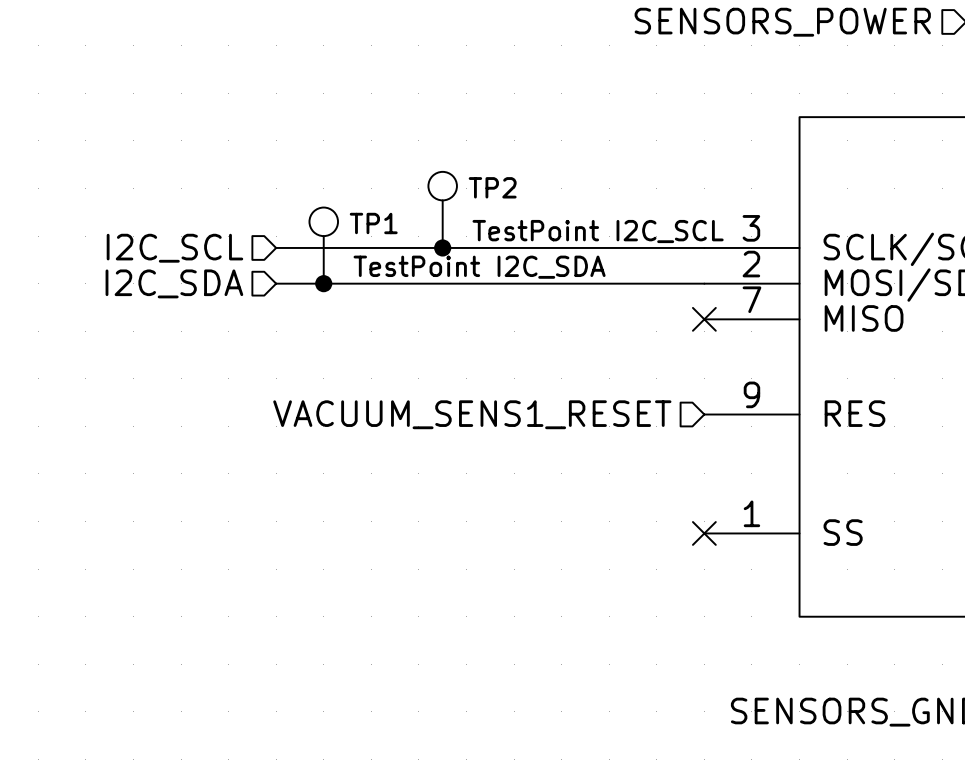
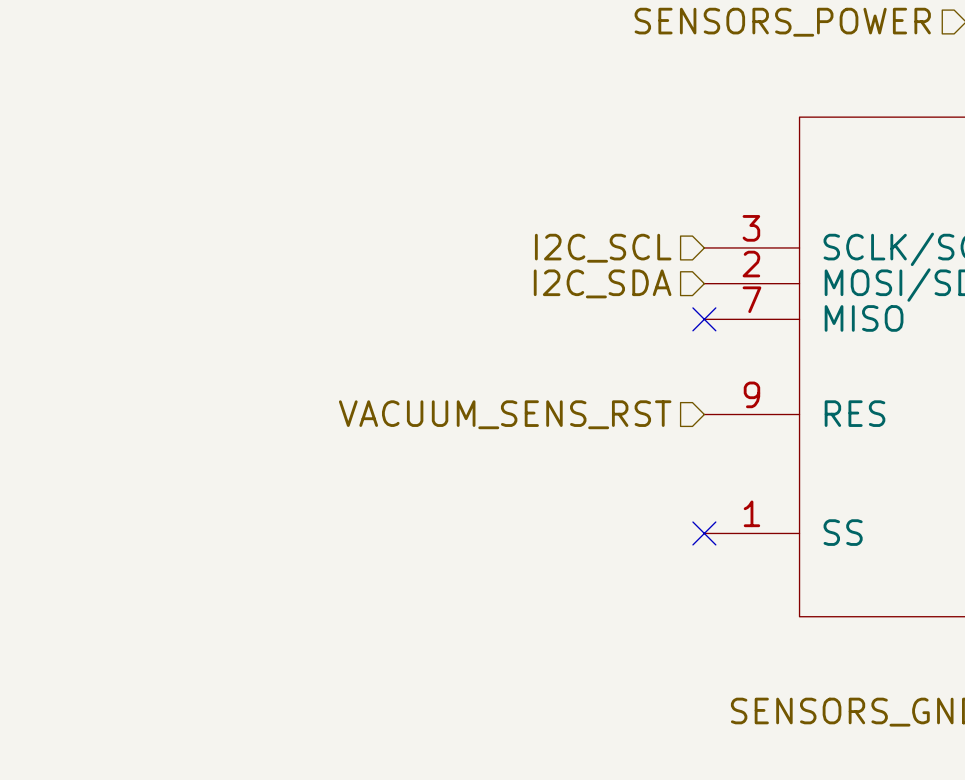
TP2: TestPoint I2C_SCL (442, 209) -> none
TP1: TestPoint I2C_SDA (323, 245) -> none
wire: (276, 247) (704, 247) -> none
junction: (442, 247) -> none
hierarchical label position: I2C_SCL (174, 248) -> I2C_SCL (603, 248)
hierarchical label position: I2C_SDA (174, 283) -> I2C_SDA (602, 283)
wire: (276, 283) (704, 283) -> none
junction: (323, 283) -> none
hierarchical label: VACUUM_SENS1_RESET (472, 414) -> VACUUM_SENS_RST (505, 414)

